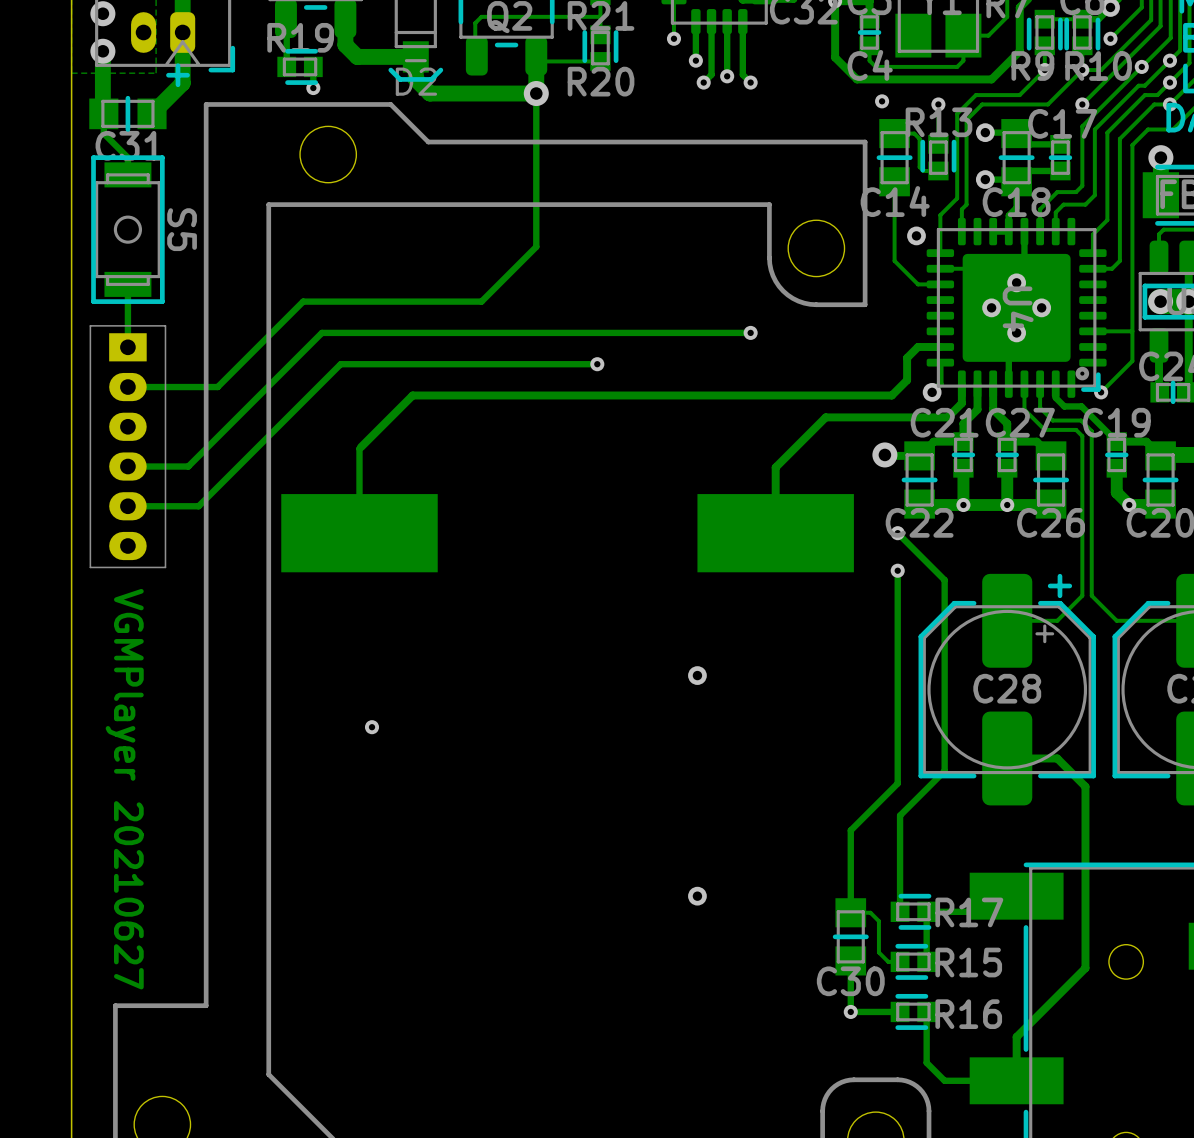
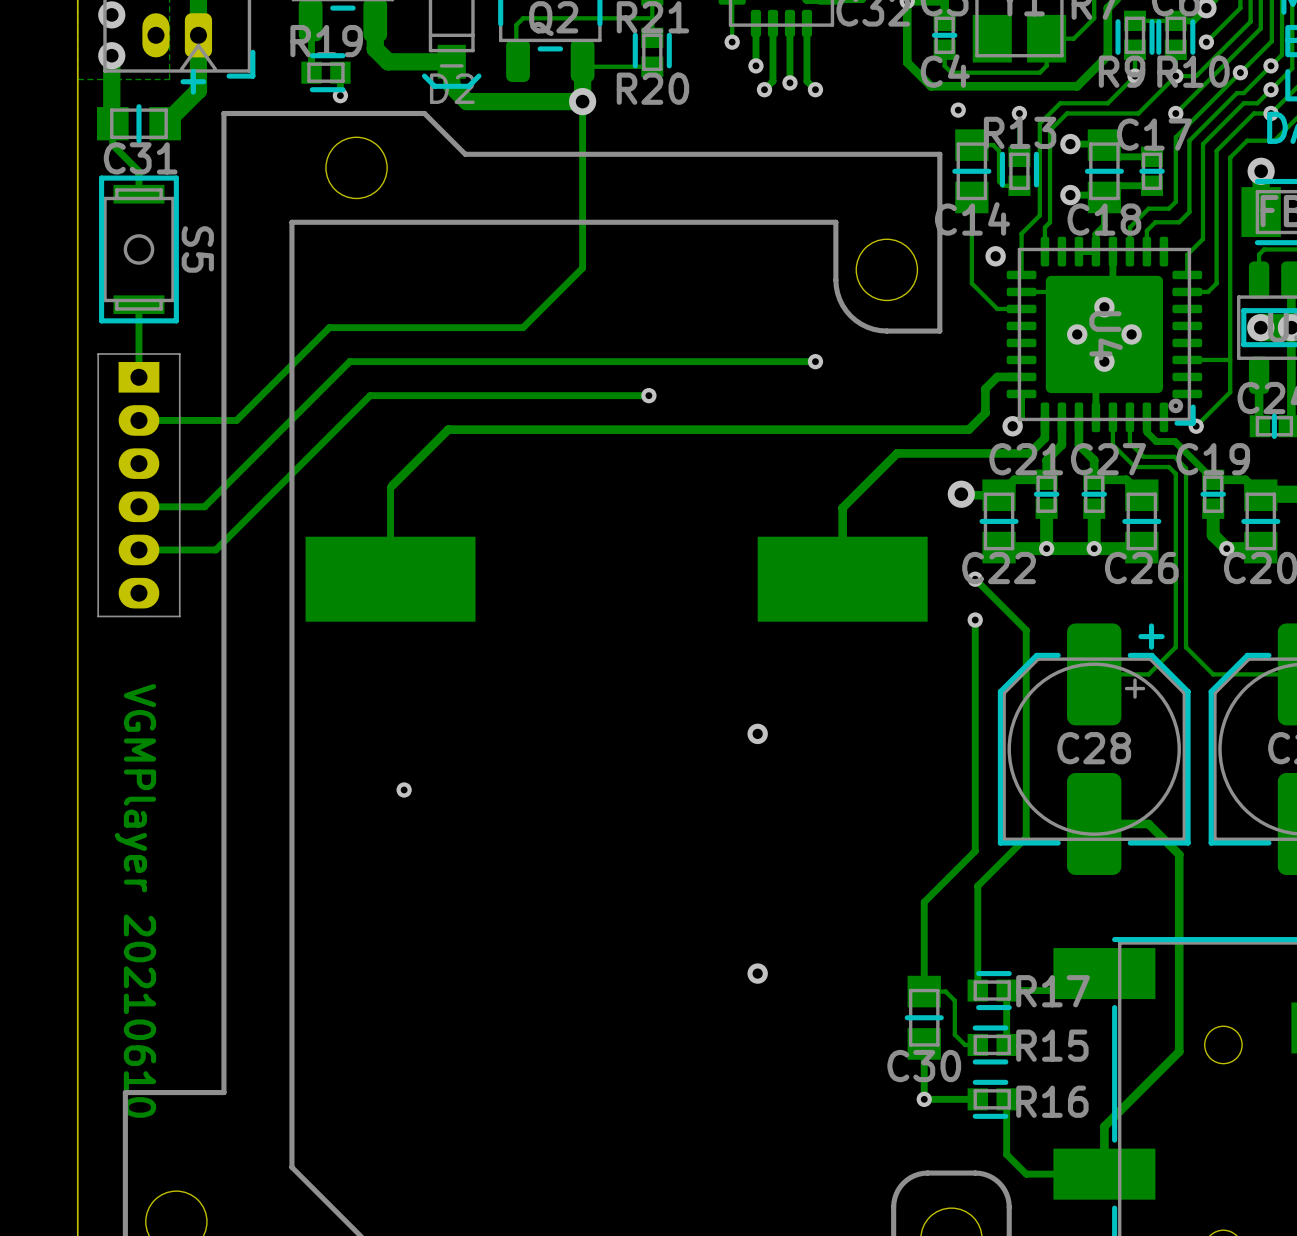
S5 footprint: [91, 155, 165, 304] -> [99, 175, 179, 324]
text: VGMPlayer 20210627 (124, 789) -> VGMPlayer 20210610 (135, 900)

